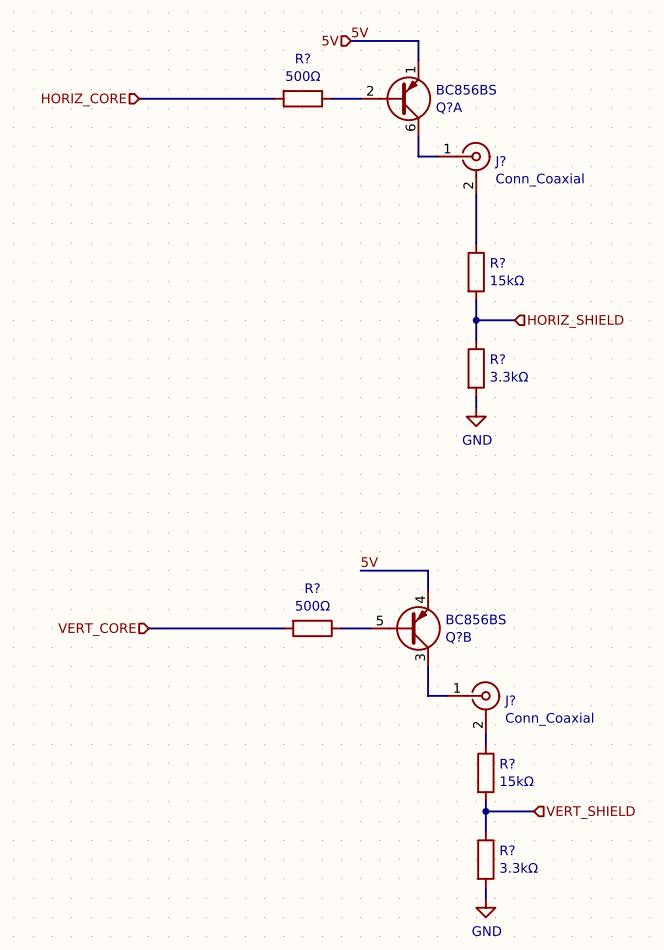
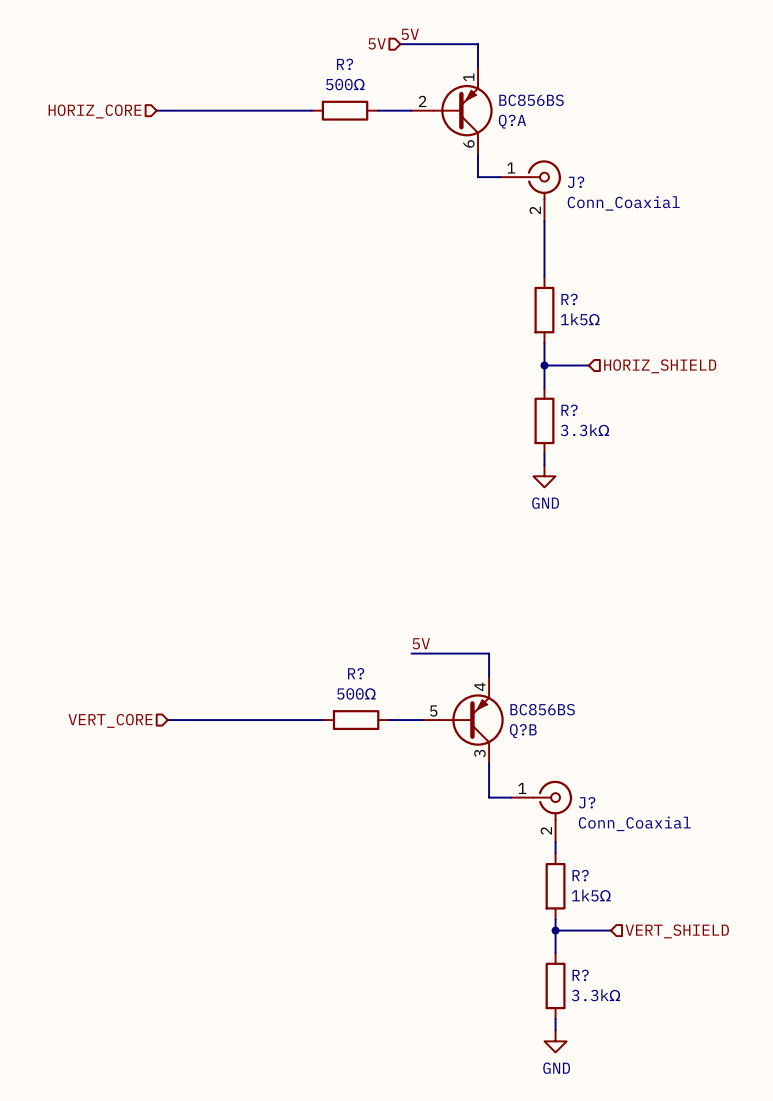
R? value: 15kΩ (507, 280) -> 1k5Ω (580, 319)
R? value: 15kΩ (517, 781) -> 1k5Ω (591, 895)

